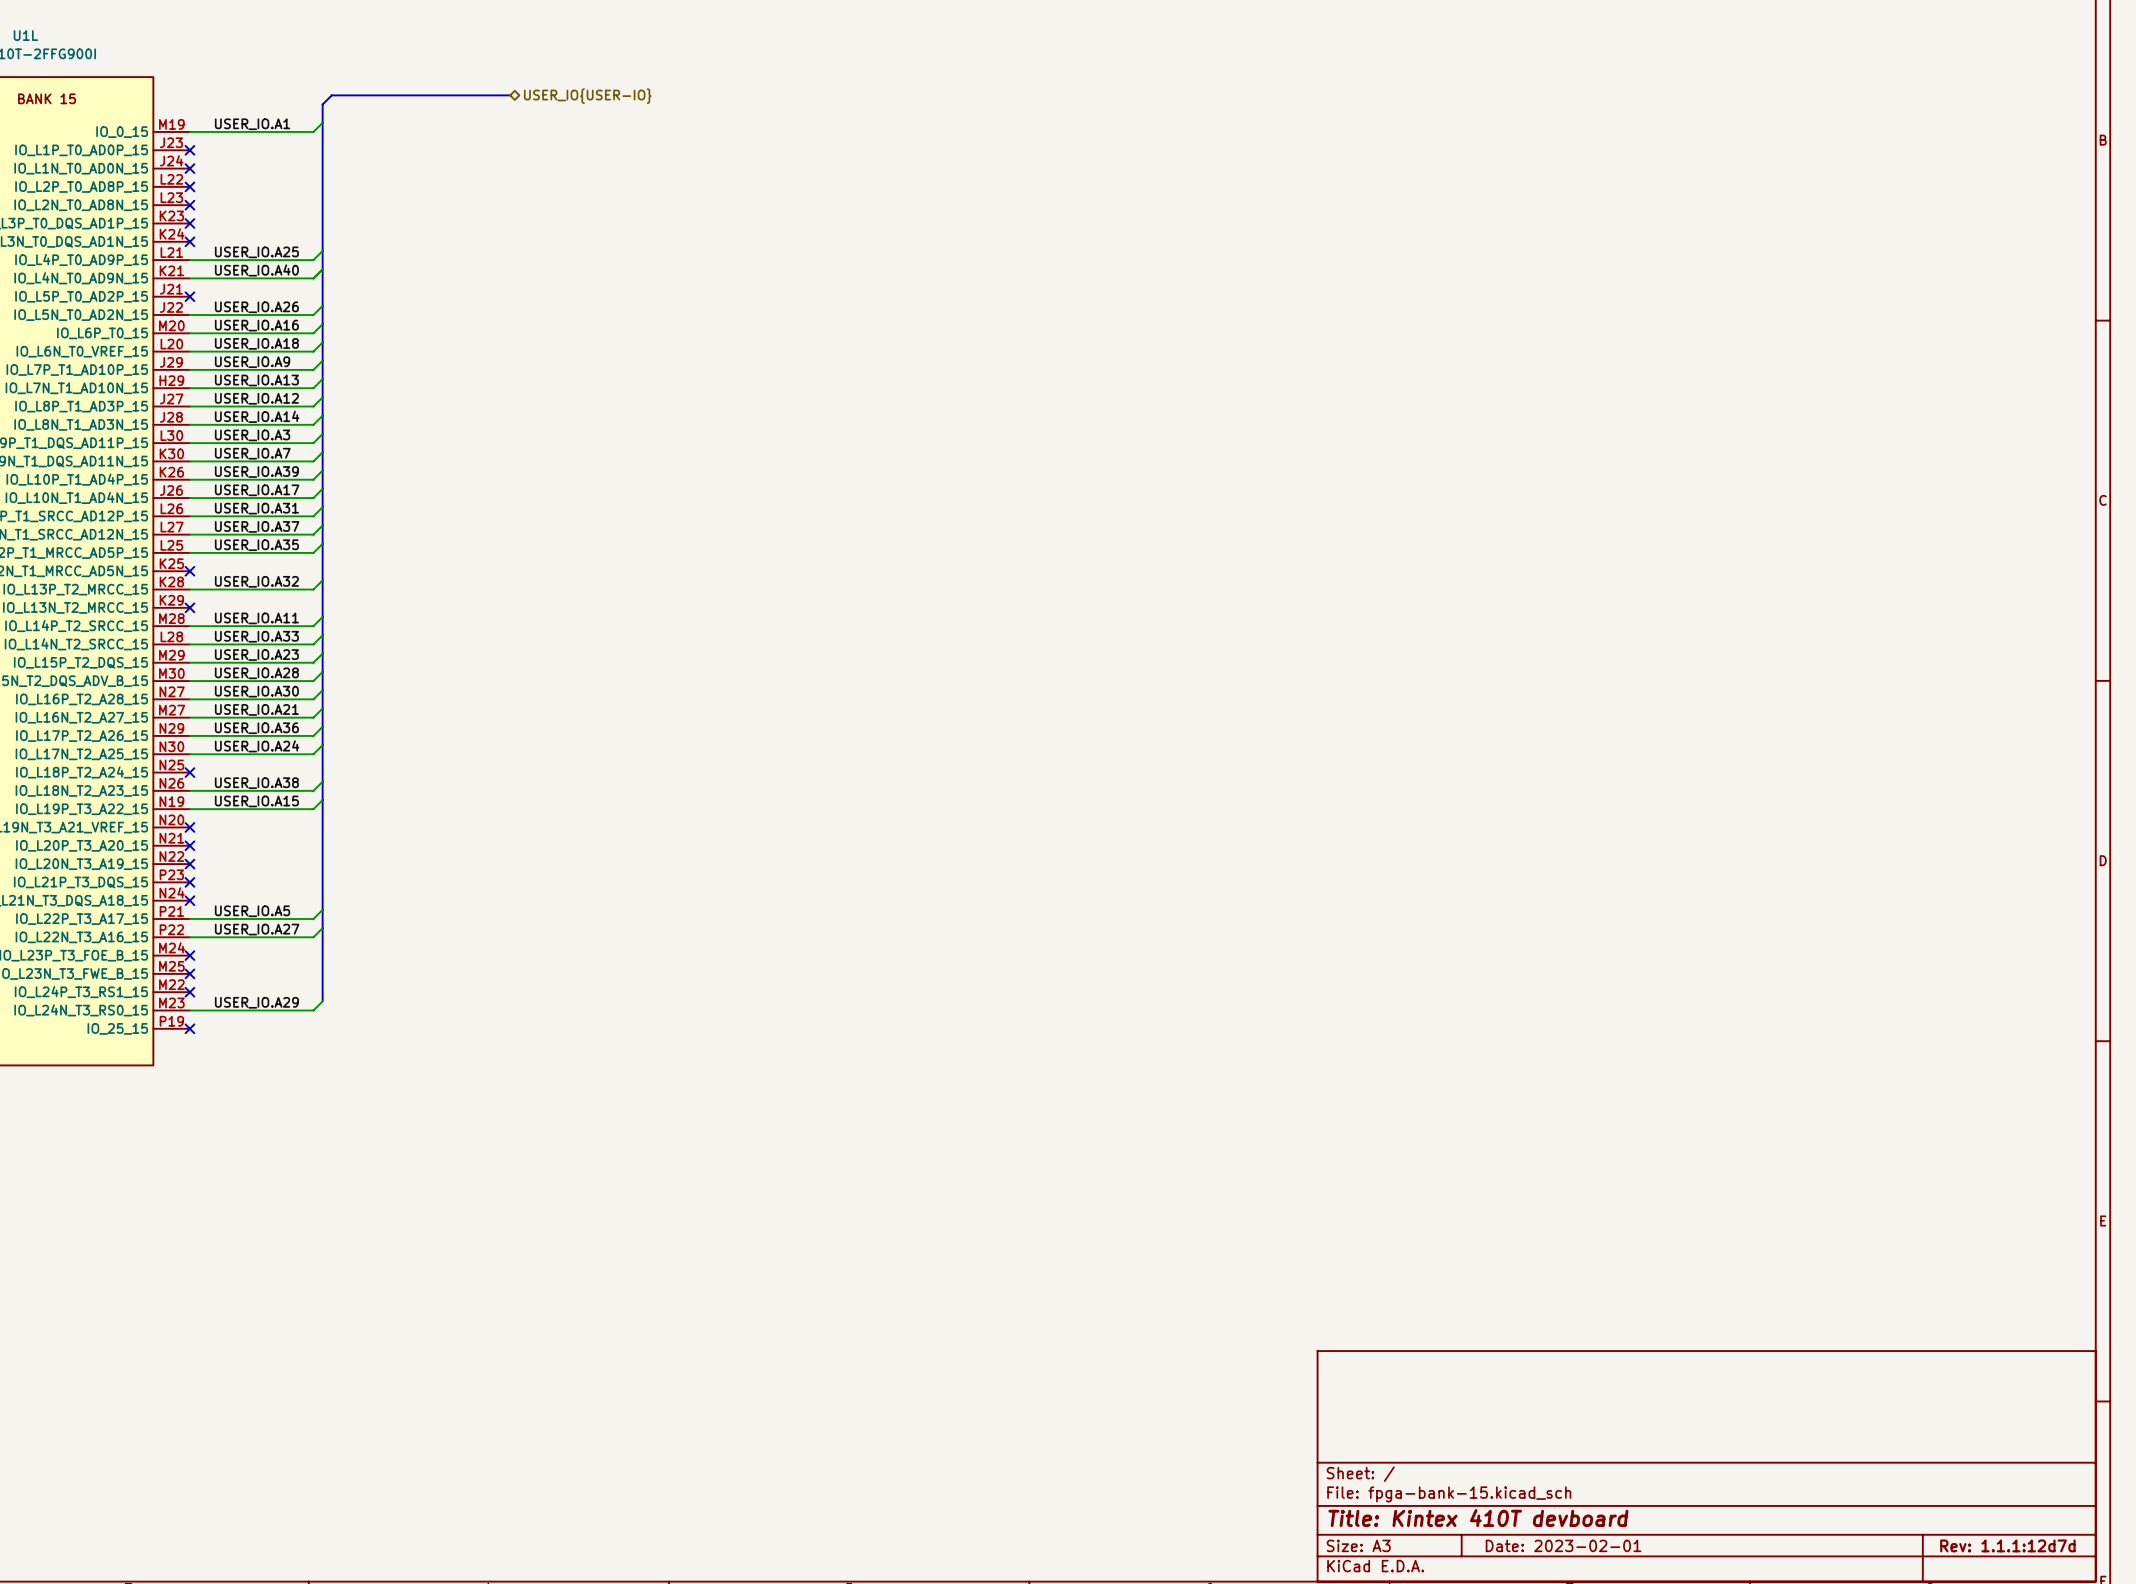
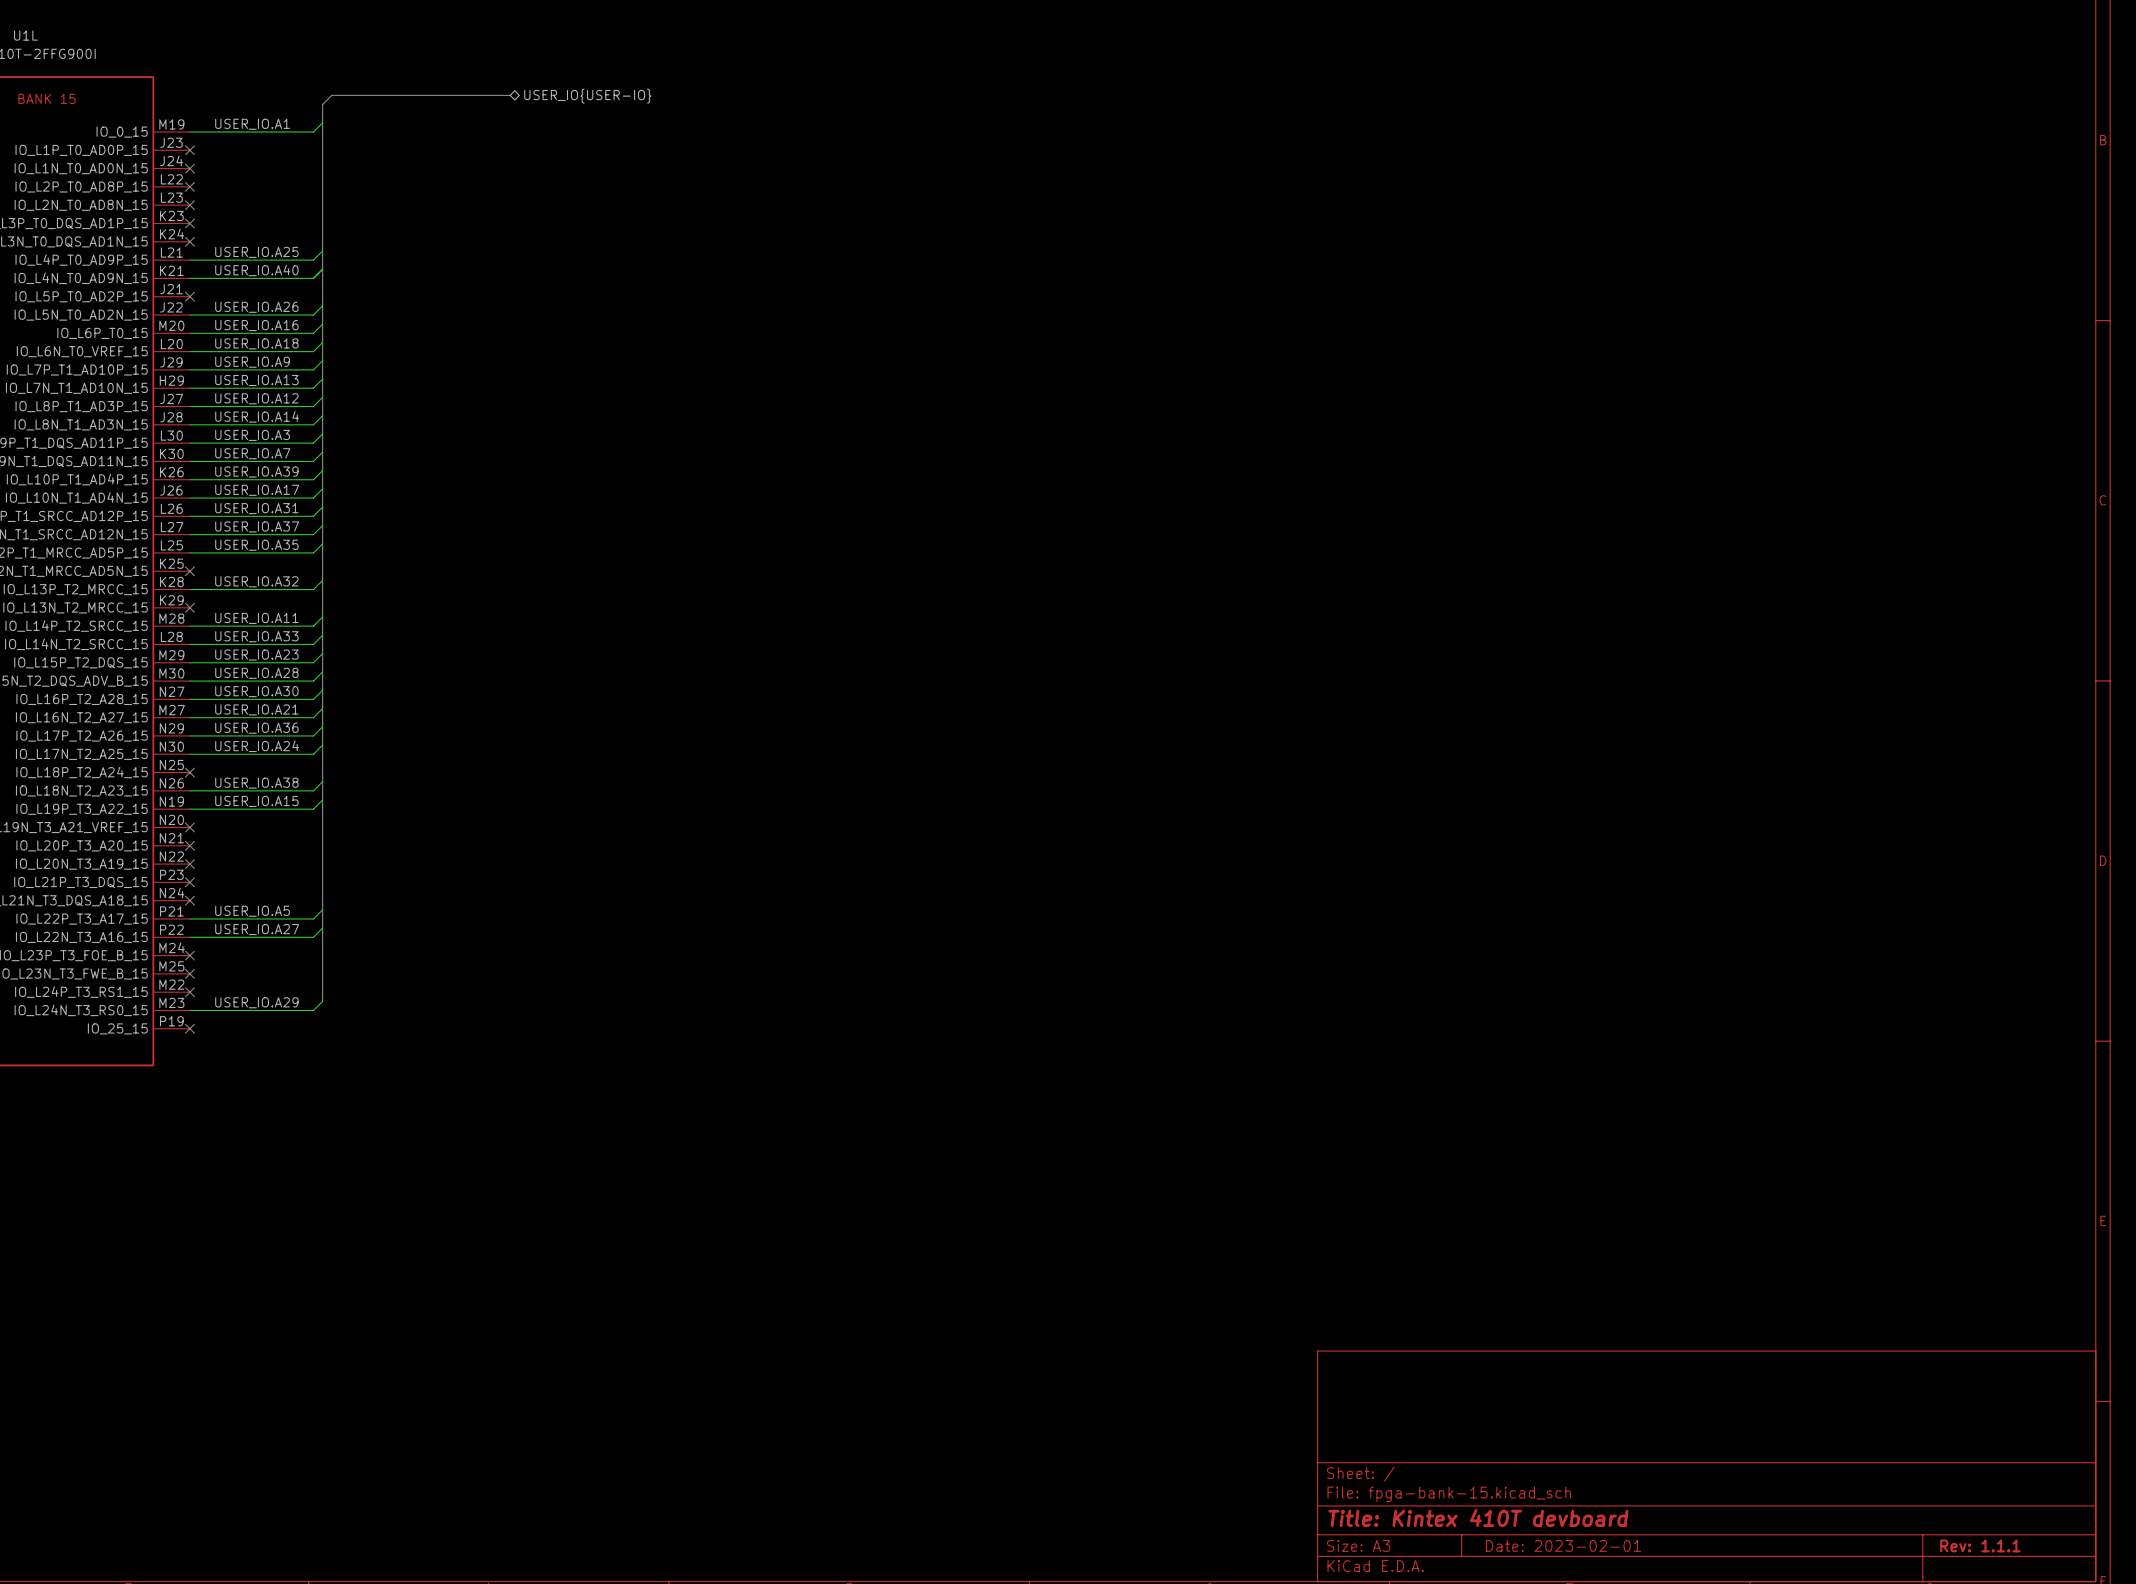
title block: Rev: 1.1.1:12d7d (2007, 1545) -> Rev: 1.1.1 (1980, 1545)

